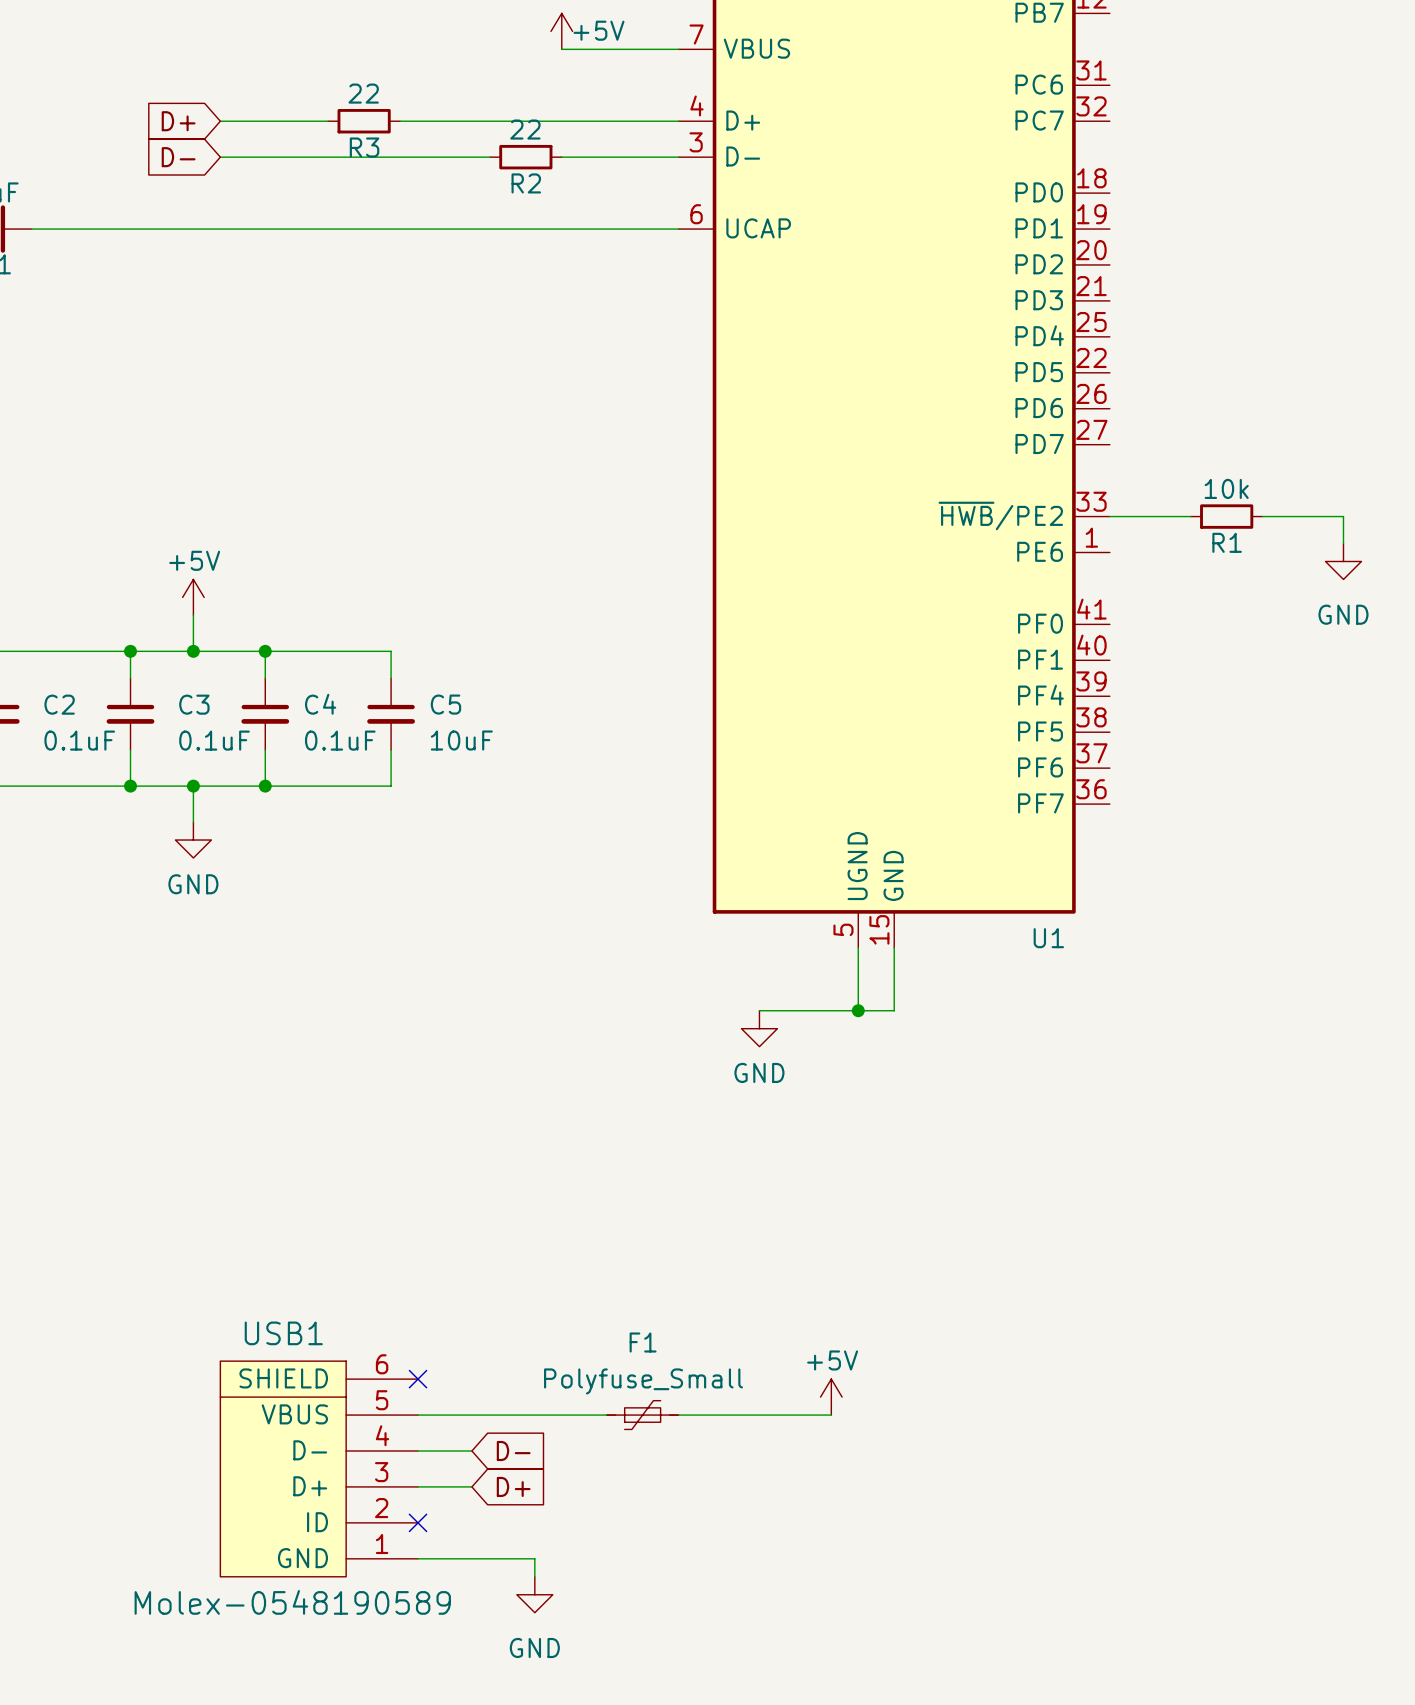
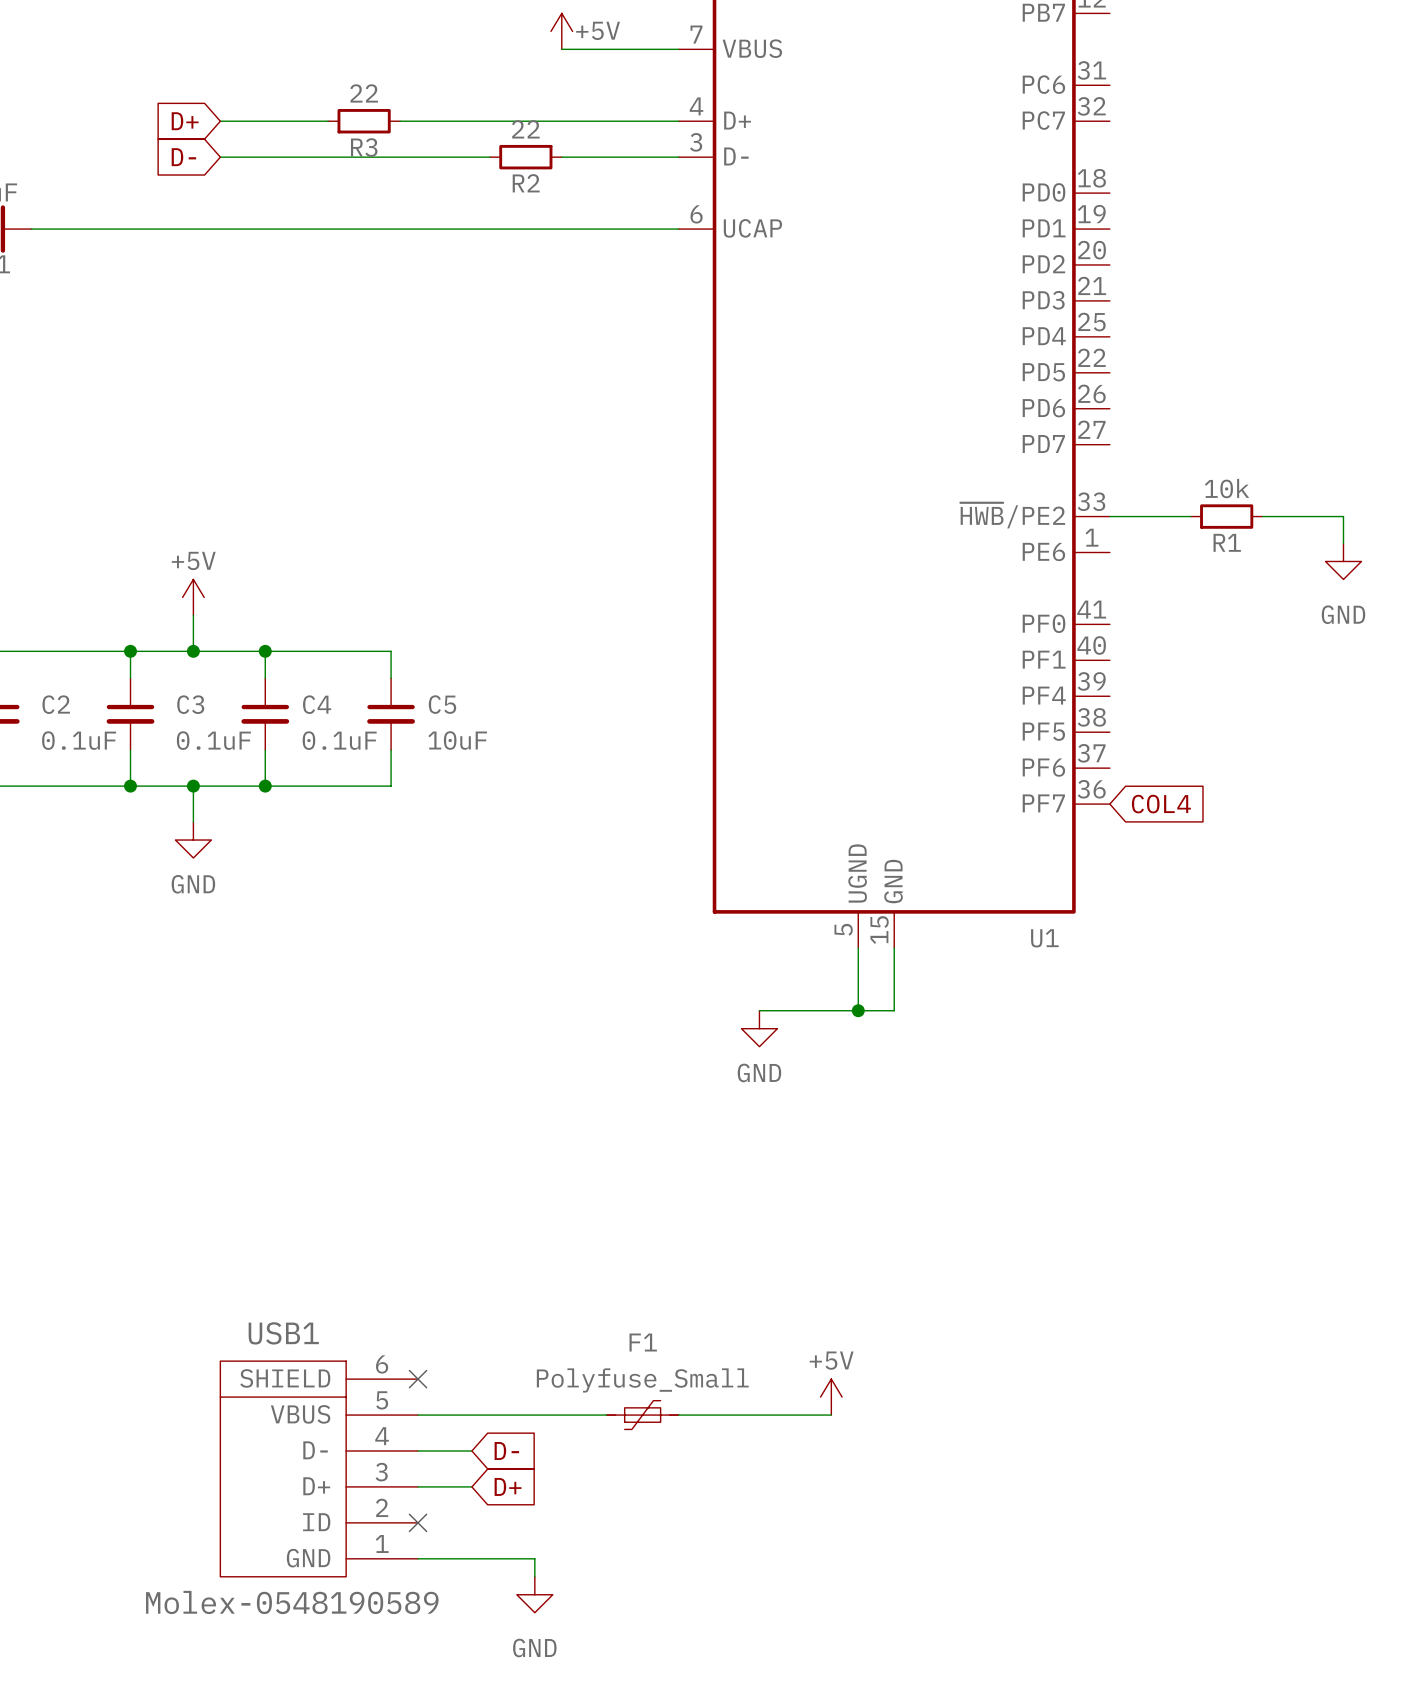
global label: none -> COL4 (1161, 804)

